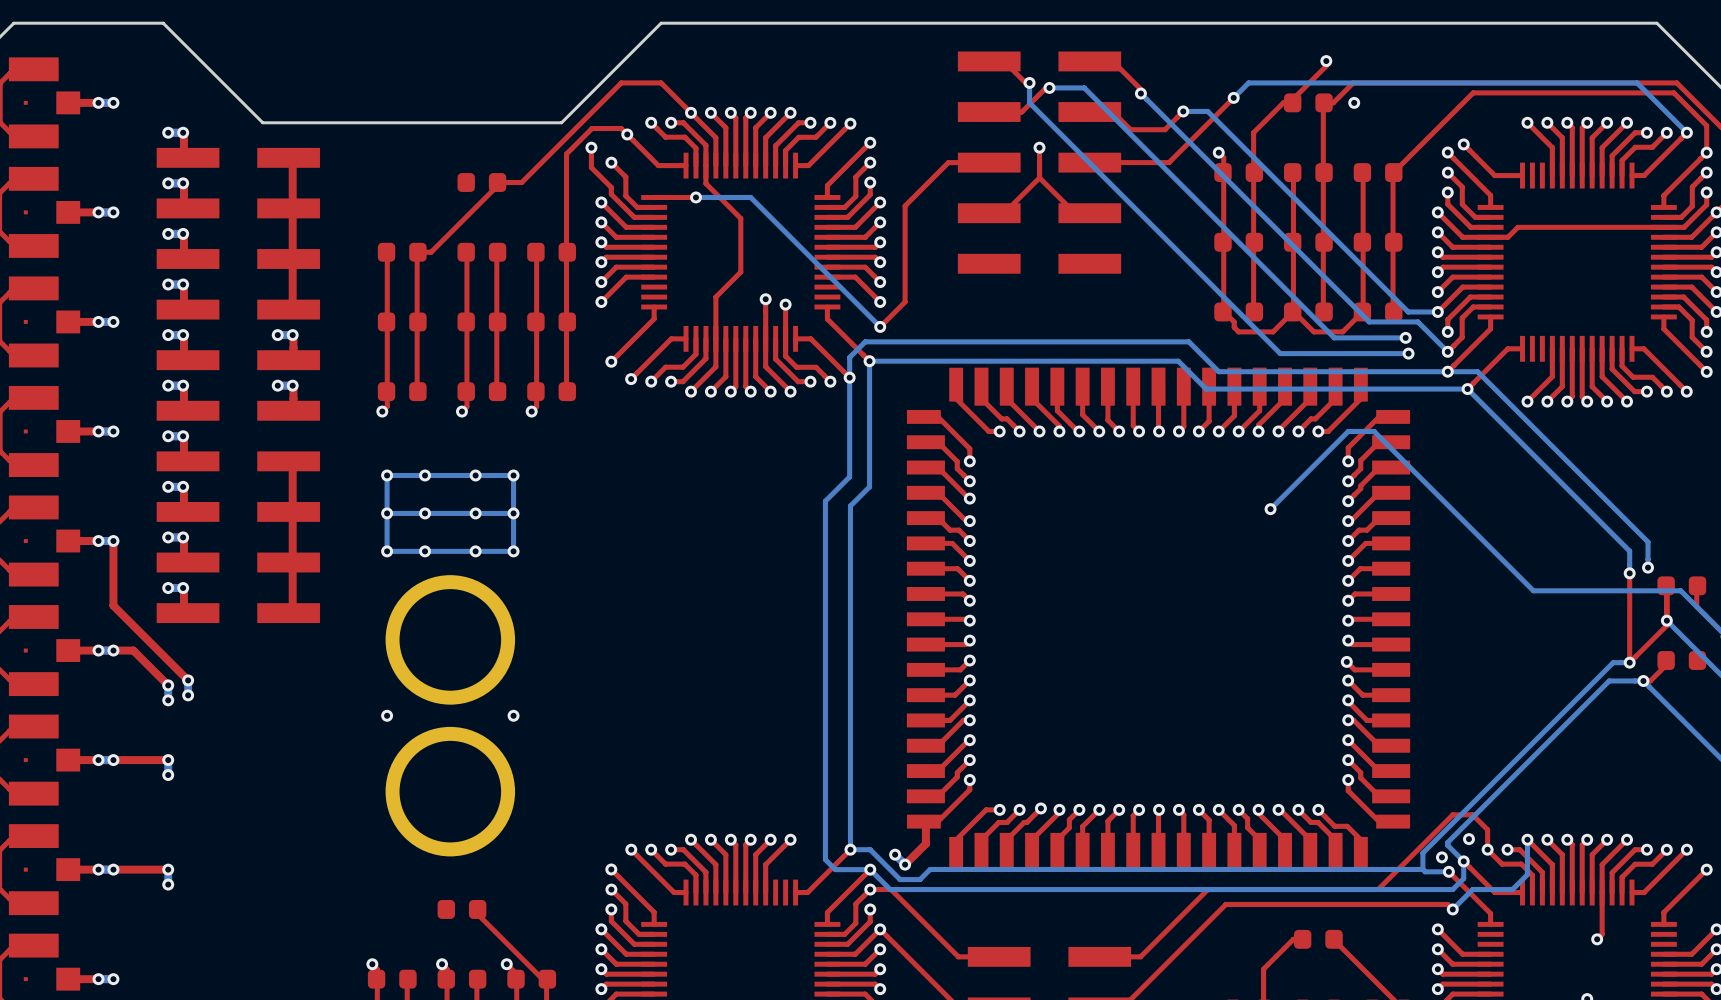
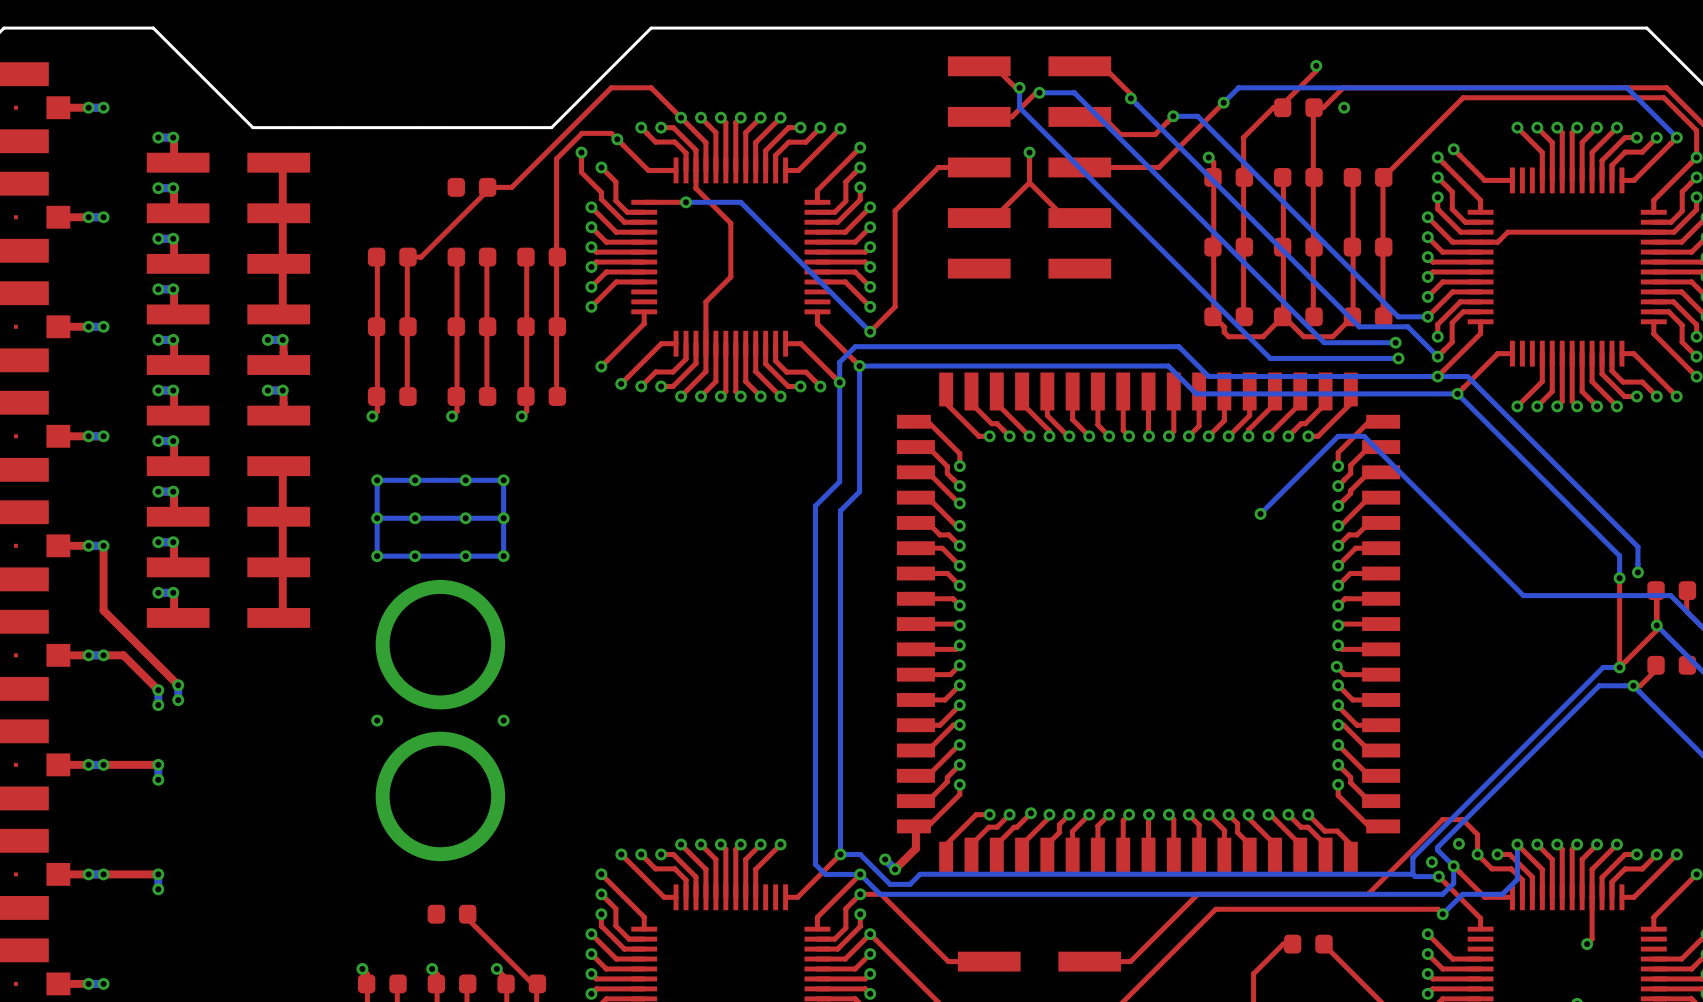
top track: (765, 299) (765, 338) -> none
via: (765, 299) -> none
top track: (785, 304) (785, 338) -> none
via: (785, 304) -> none

